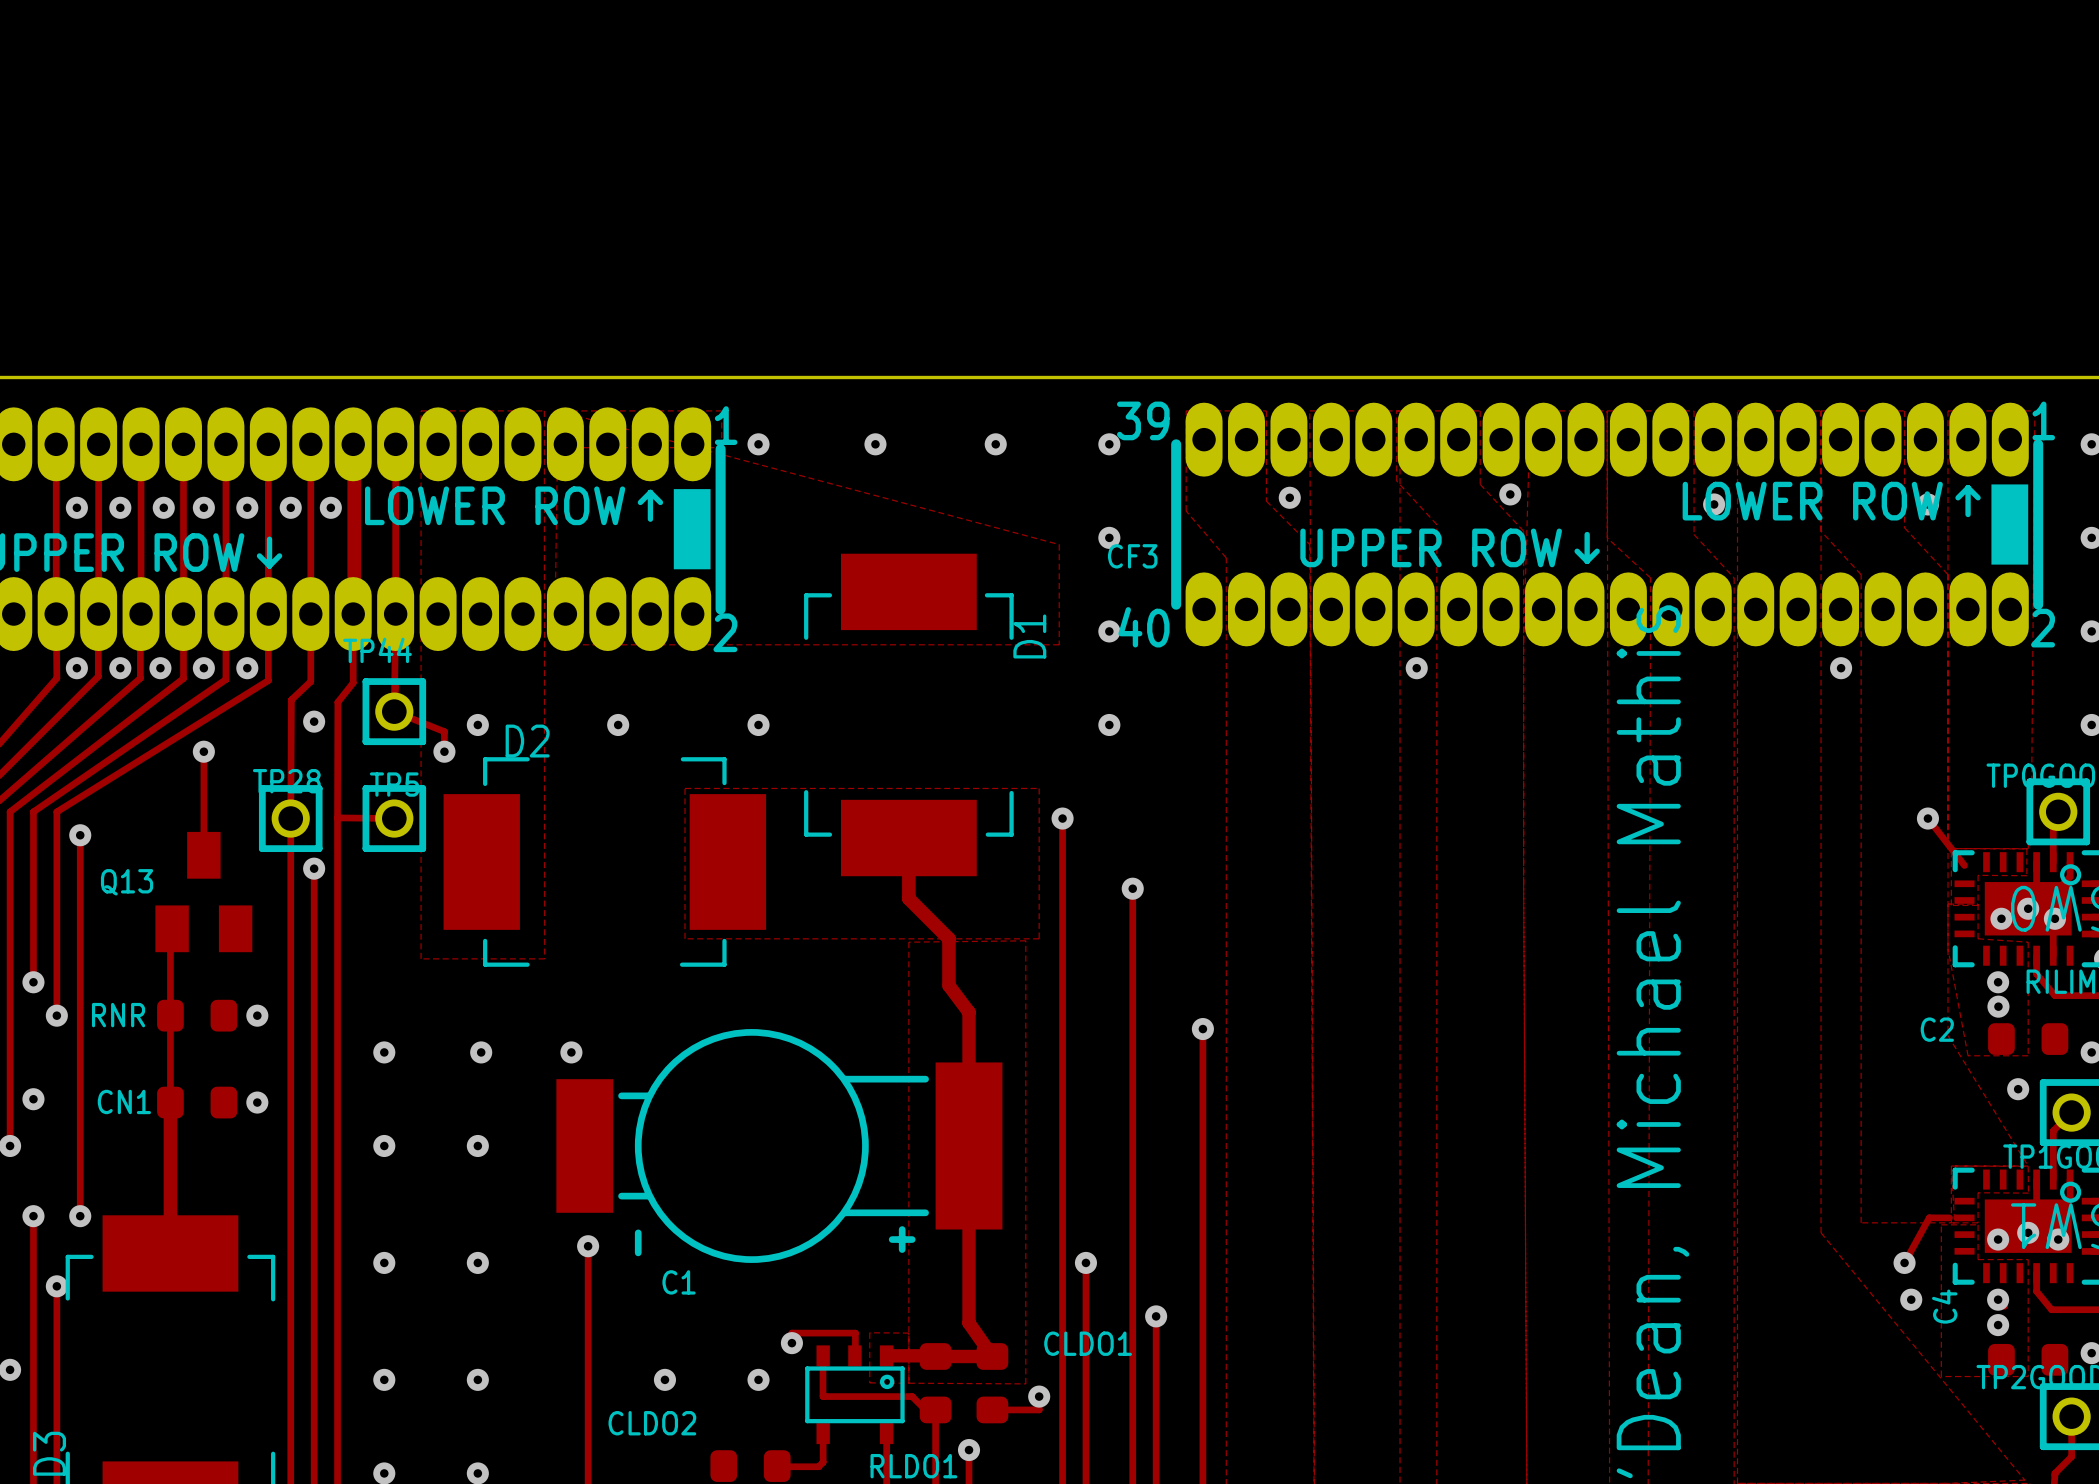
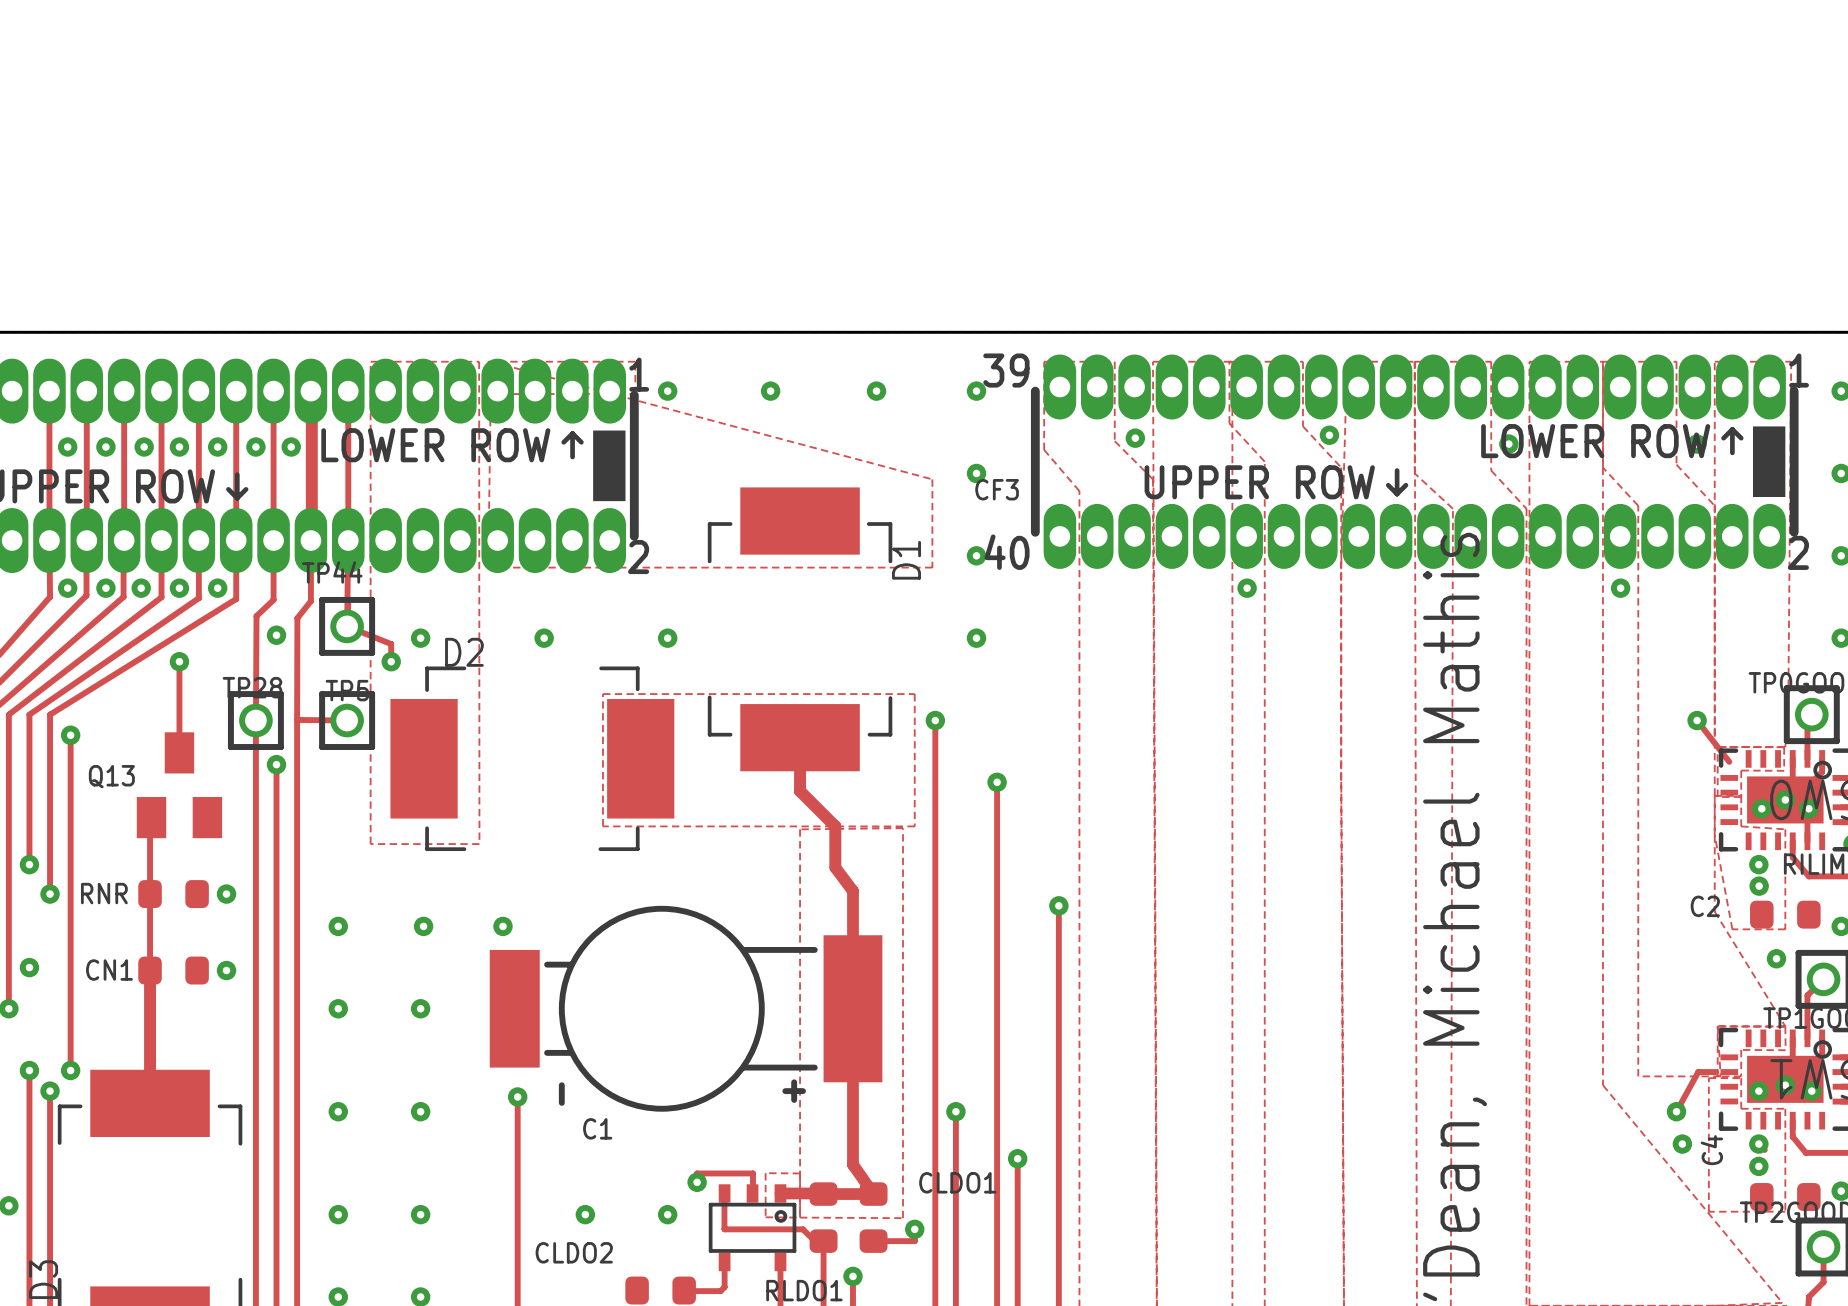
track: none -> (50, 1091) (50, 1132)
via position: (56, 1286) -> (50, 1091)

